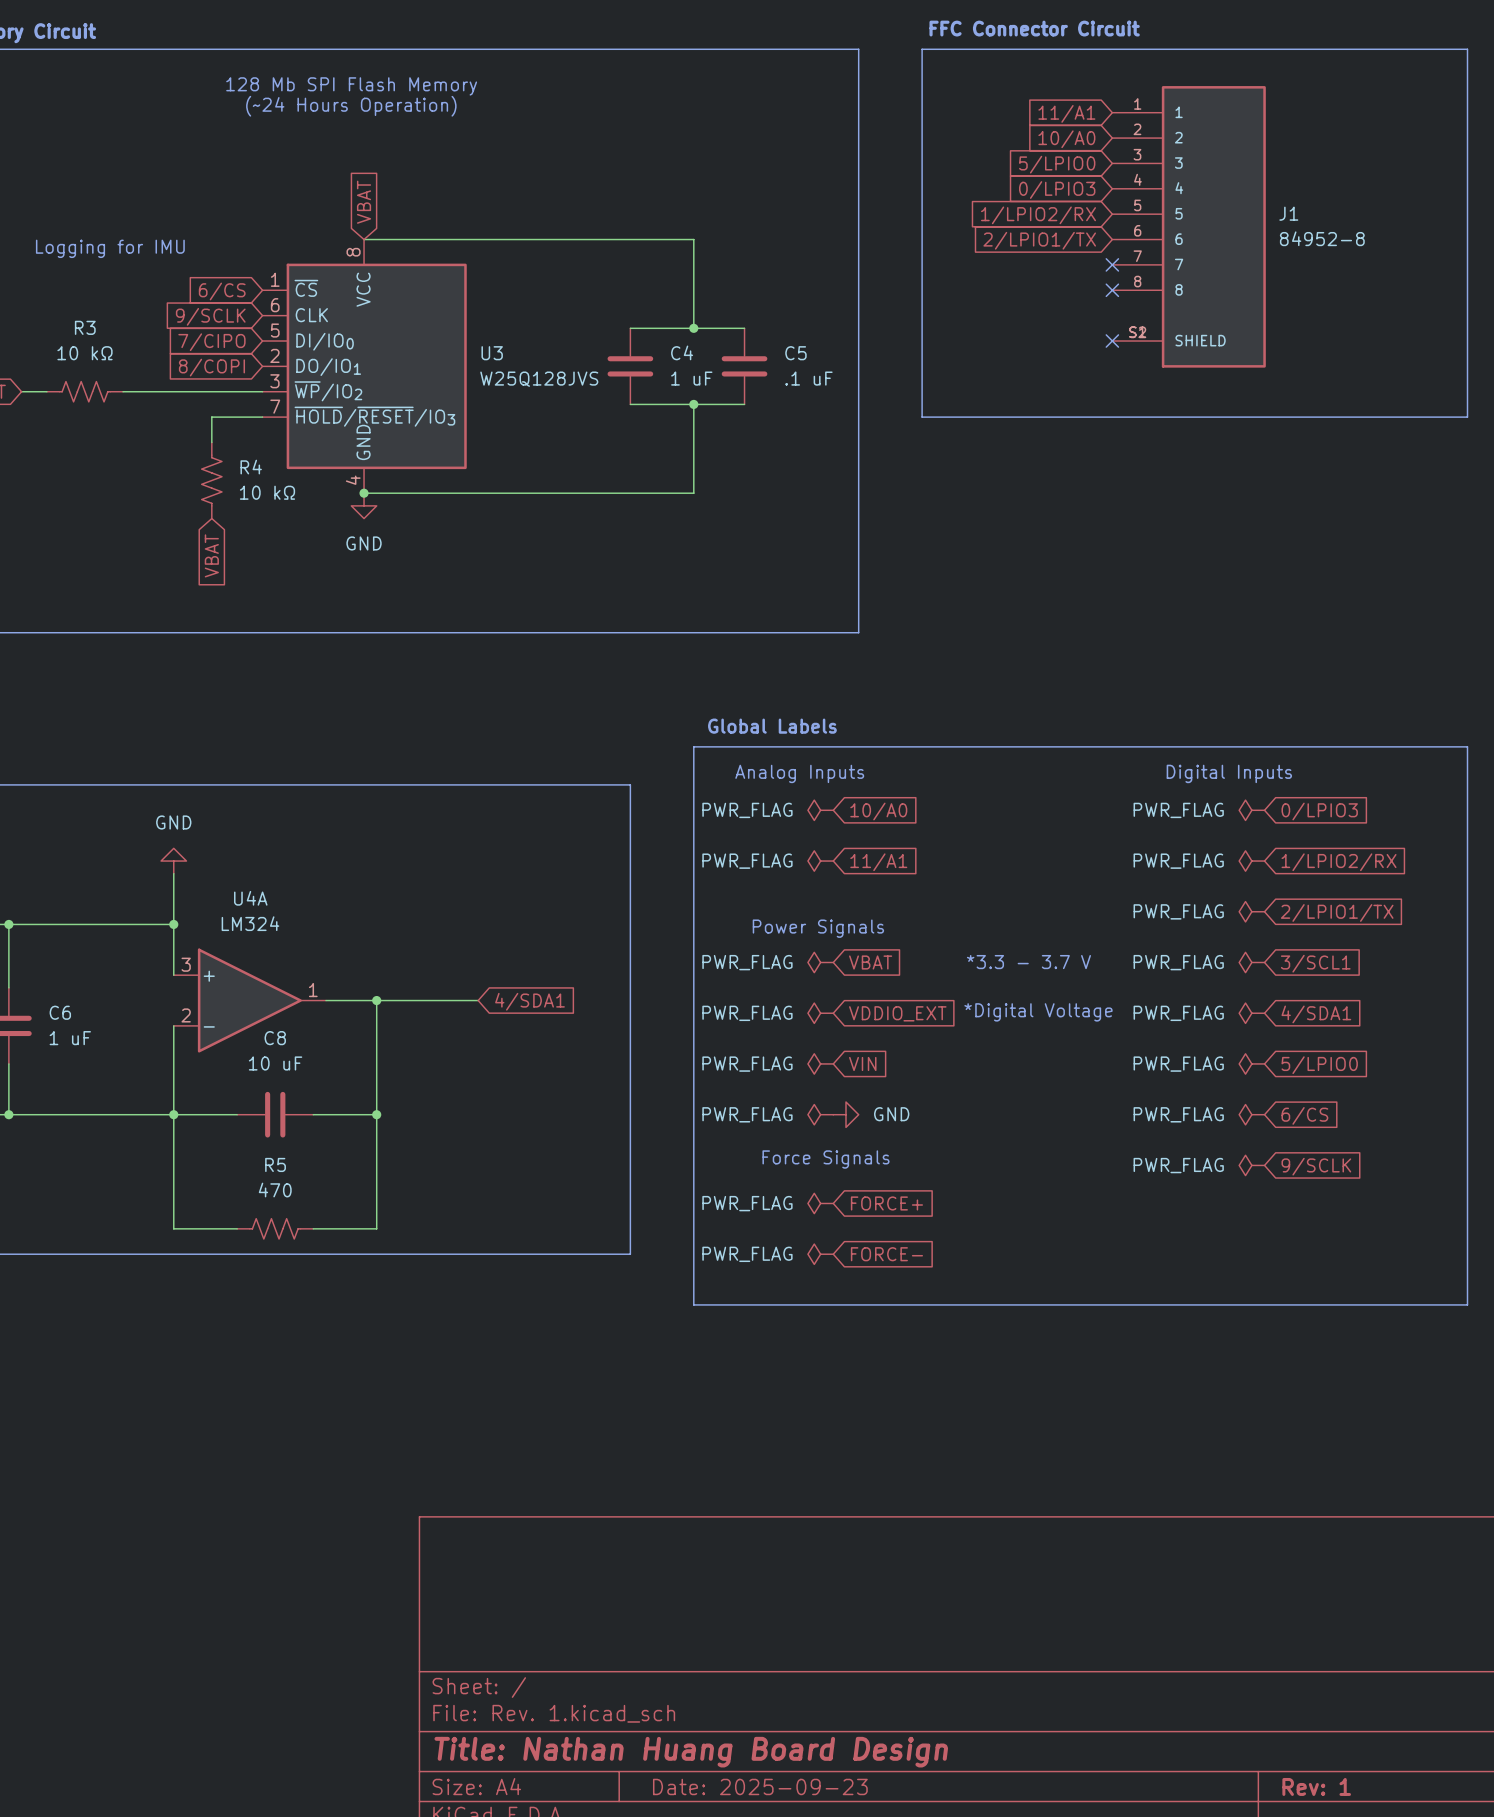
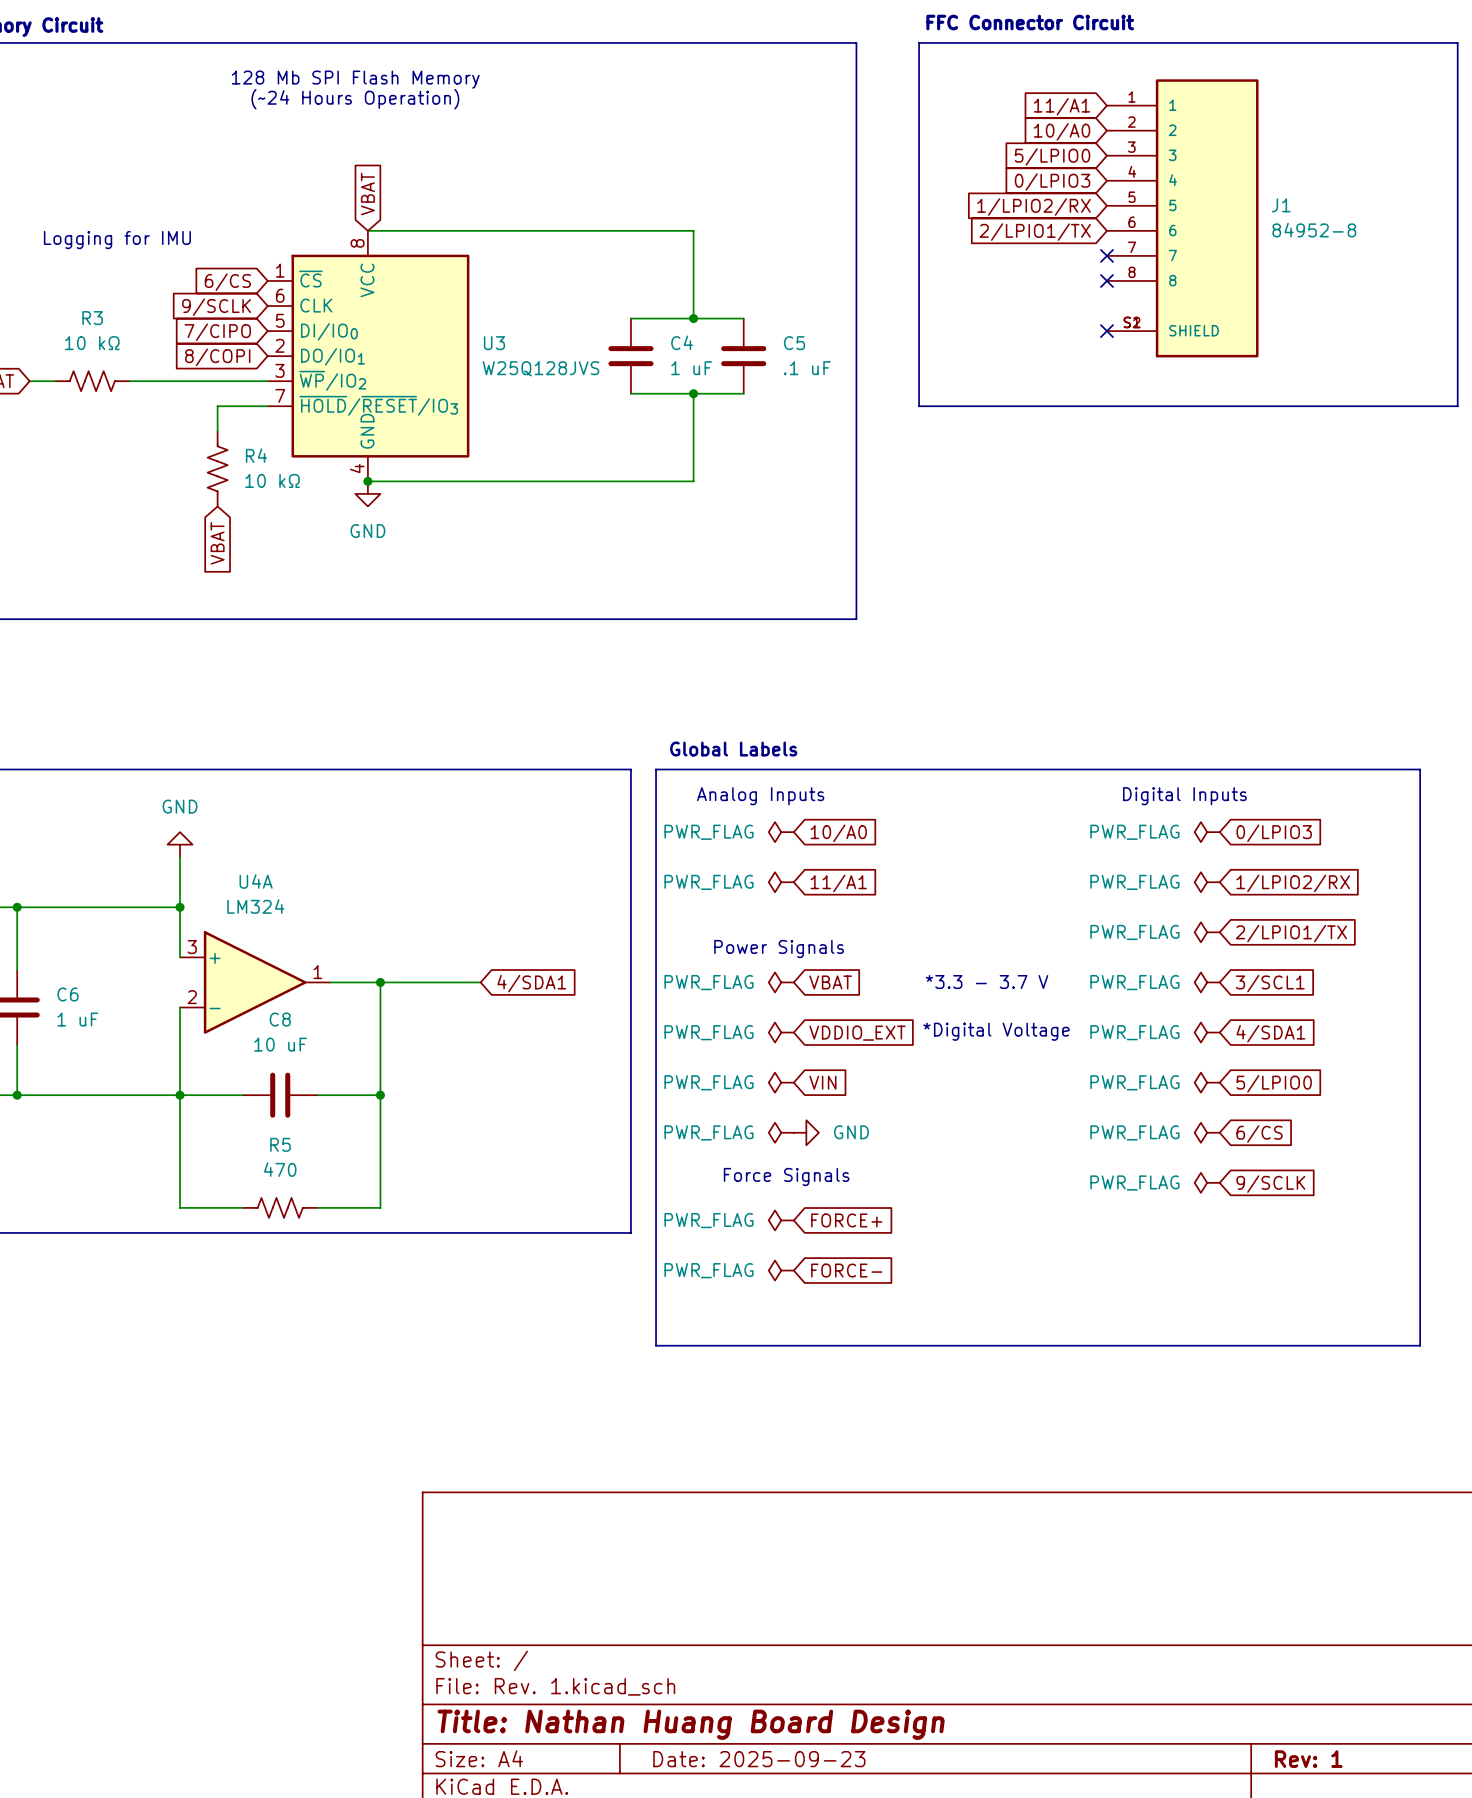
text position: Global Labels (772, 726) -> Global Labels (733, 749)
line: (693, 746) (1467, 746) (1467, 1304) (693, 1304) (693, 746) -> (656, 769) (656, 1345) (1420, 1345) (1420, 769) (656, 769)
text position: Analog Inputs (799, 773) -> Analog Inputs (760, 796)
text position: Digital Inputs (1229, 773) -> Digital Inputs (1184, 796)
power symbol: PWR_FLAG (820, 810) -> none
power symbol: PWR_FLAG (1251, 810) -> none
global label position: 10/A0 (878, 811) -> 10/A0 (838, 833)
global label position: 0/LPIO3 (1319, 811) -> 0/LPIO3 (1274, 833)
power symbol: none -> PWR_FLAG (781, 832)
power symbol: none -> PWR_FLAG (1207, 832)
power symbol: PWR_FLAG (820, 861) -> none
power symbol: PWR_FLAG (1251, 861) -> none
global label position: 11/A1 (878, 862) -> 11/A1 (838, 883)
global label position: 1/LPIO2/RX (1339, 862) -> 1/LPIO2/RX (1293, 883)
power symbol: none -> PWR_FLAG (781, 882)
power symbol: none -> PWR_FLAG (1207, 882)
power symbol: PWR_FLAG (1251, 911) -> none
global label position: 2/LPIO1/TX (1337, 912) -> 2/LPIO1/TX (1291, 933)
text position: Power Signals (818, 928) -> Power Signals (779, 949)
power symbol: none -> PWR_FLAG (1207, 932)
power symbol: PWR_FLAG (820, 962) -> none
global label position: VBAT (870, 962) -> VBAT (830, 982)
text position: *3.3 - 3.7 V (1028, 962) -> *3.3 - 3.7 V (987, 982)
power symbol: PWR_FLAG (1251, 962) -> none
global label position: 3/SCL1 (1315, 963) -> 3/SCL1 (1270, 983)
power symbol: none -> PWR_FLAG (781, 982)
power symbol: none -> PWR_FLAG (1207, 982)
text position: *Digital Voltage (1038, 1012) -> *Digital Voltage (996, 1031)
power symbol: PWR_FLAG (820, 1013) -> none
global label position: VDDIO_EXT (897, 1013) -> VDDIO_EXT (857, 1033)
power symbol: PWR_FLAG (1251, 1013) -> none
global label position: 4/SDA1 (1316, 1014) -> 4/SDA1 (1270, 1033)
power symbol: none -> PWR_FLAG (781, 1032)
power symbol: none -> PWR_FLAG (1207, 1032)
power symbol: PWR_FLAG (820, 1063) -> none
global label position: VIN (862, 1063) -> VIN (822, 1082)
power symbol: PWR_FLAG (1251, 1063) -> none
global label position: 5/LPIO0 (1319, 1065) -> 5/LPIO0 (1274, 1083)
power symbol: none -> PWR_FLAG (781, 1082)
power symbol: none -> PWR_FLAG (1207, 1082)
power symbol: PWR_FLAG (820, 1114) -> none
power symbol position: GND (846, 1114) -> GND (806, 1132)
power symbol: PWR_FLAG (1251, 1114) -> none
global label position: 6/CS (1304, 1115) -> 6/CS (1259, 1133)
power symbol: none -> PWR_FLAG (781, 1132)
power symbol: none -> PWR_FLAG (1207, 1132)
text position: Force Signals (826, 1159) -> Force Signals (786, 1177)
power symbol: PWR_FLAG (1251, 1165) -> none
global label position: 9/SCLK (1316, 1166) -> 9/SCLK (1270, 1184)
power symbol: PWR_FLAG (820, 1203) -> none
global label position: FORCE+ (886, 1203) -> FORCE+ (846, 1220)
power symbol: none -> PWR_FLAG (1207, 1182)
power symbol: none -> PWR_FLAG (781, 1220)
power symbol: PWR_FLAG (820, 1254) -> none
global label position: FORCE- (886, 1254) -> FORCE- (846, 1270)
power symbol: none -> PWR_FLAG (781, 1270)

